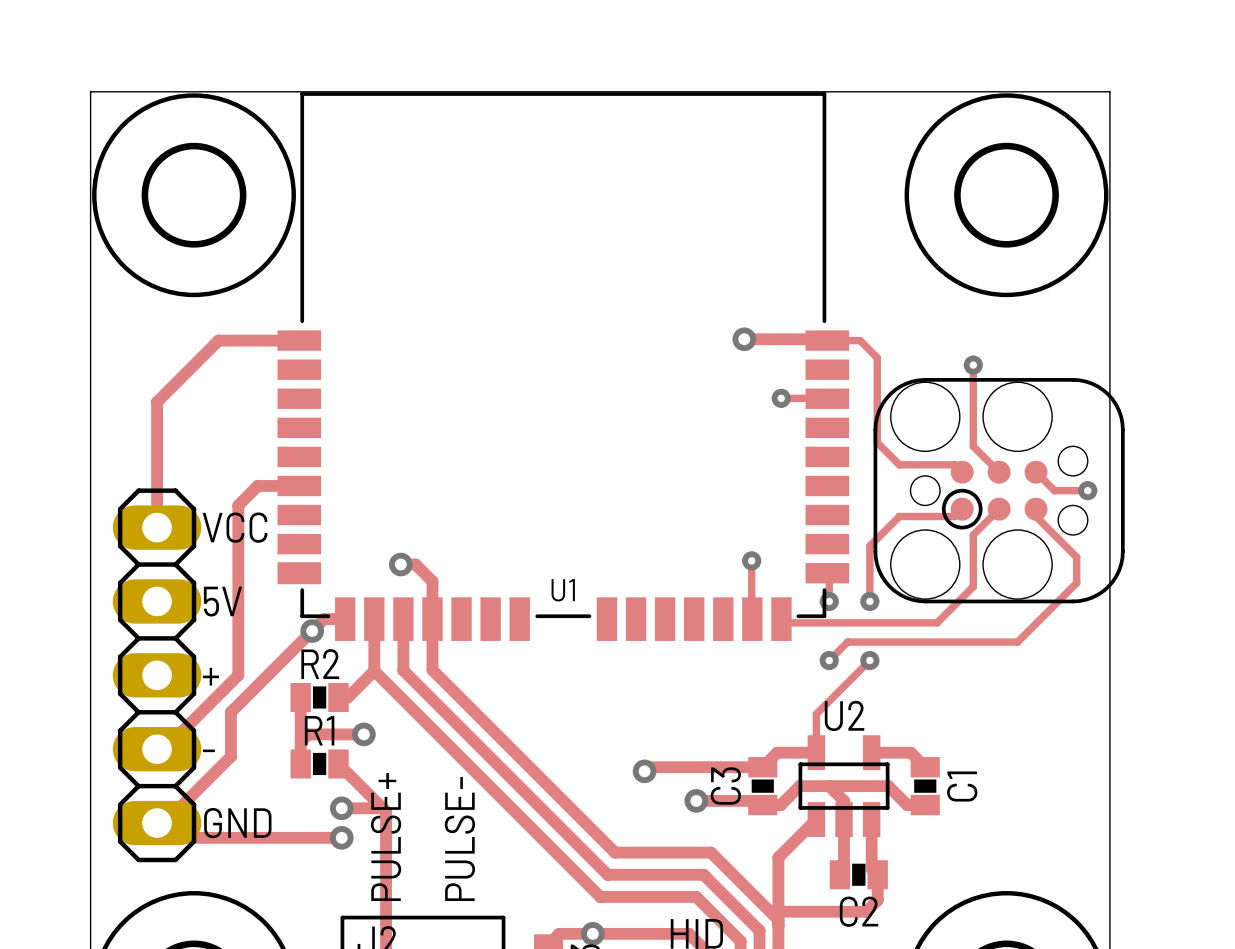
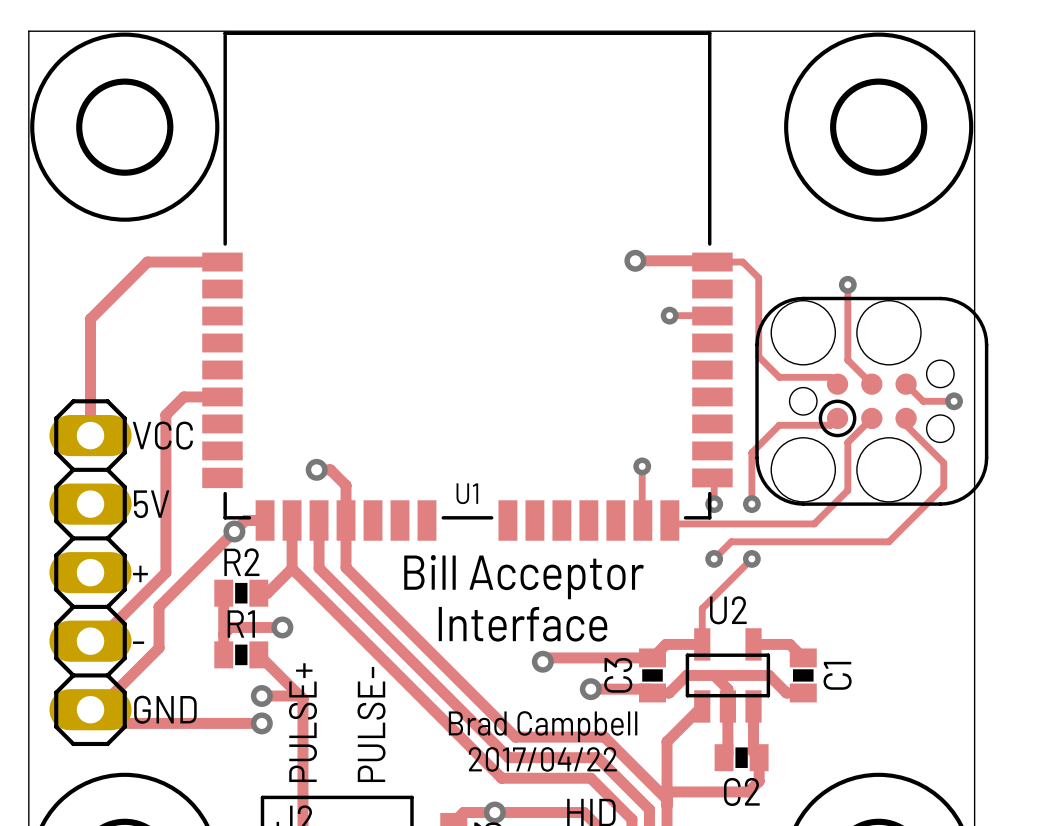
text: none -> Bill Acceptor (524, 577)
text: none -> Interface (523, 624)
text: none -> Brad Campbell (543, 726)
text: none -> 2017/04/22 (542, 759)

